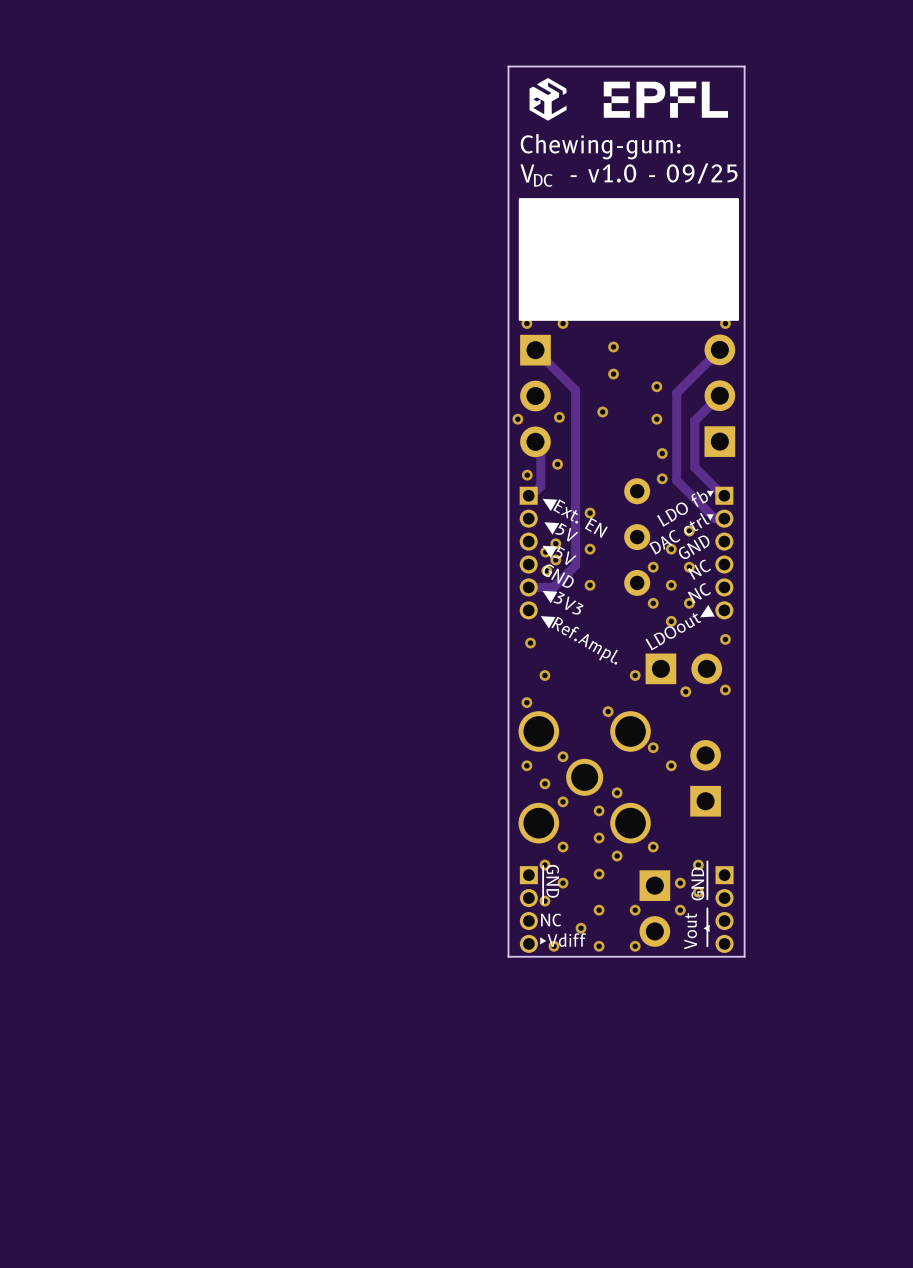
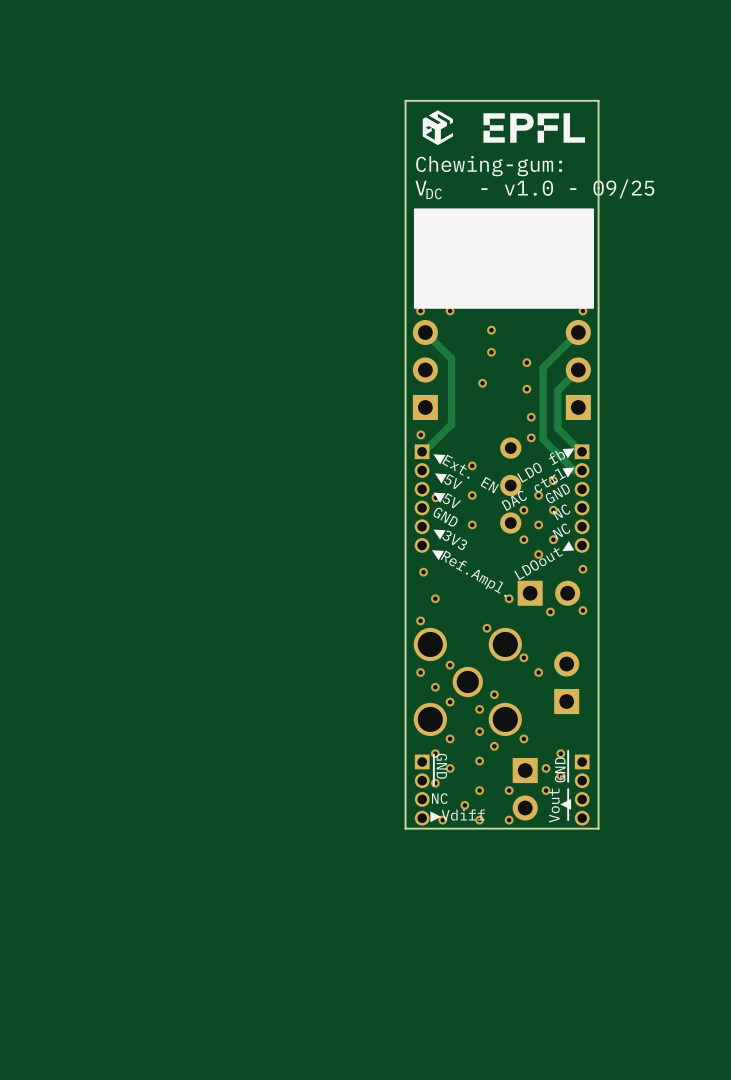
track: (535, 350) (575, 390) (575, 565) (553, 587) (528, 587) -> none
part rotation: 0° (535, 396) -> 180° (425, 370)
via: (559, 417) -> none
via: (517, 419) -> none
track: (535, 441) (540, 447) (540, 486) -> (425, 332) (451, 358) (451, 424) (431, 443)
via: (557, 464) -> none
via: (555, 543) -> none
via: (555, 559) -> none
via: (546, 570) -> none

